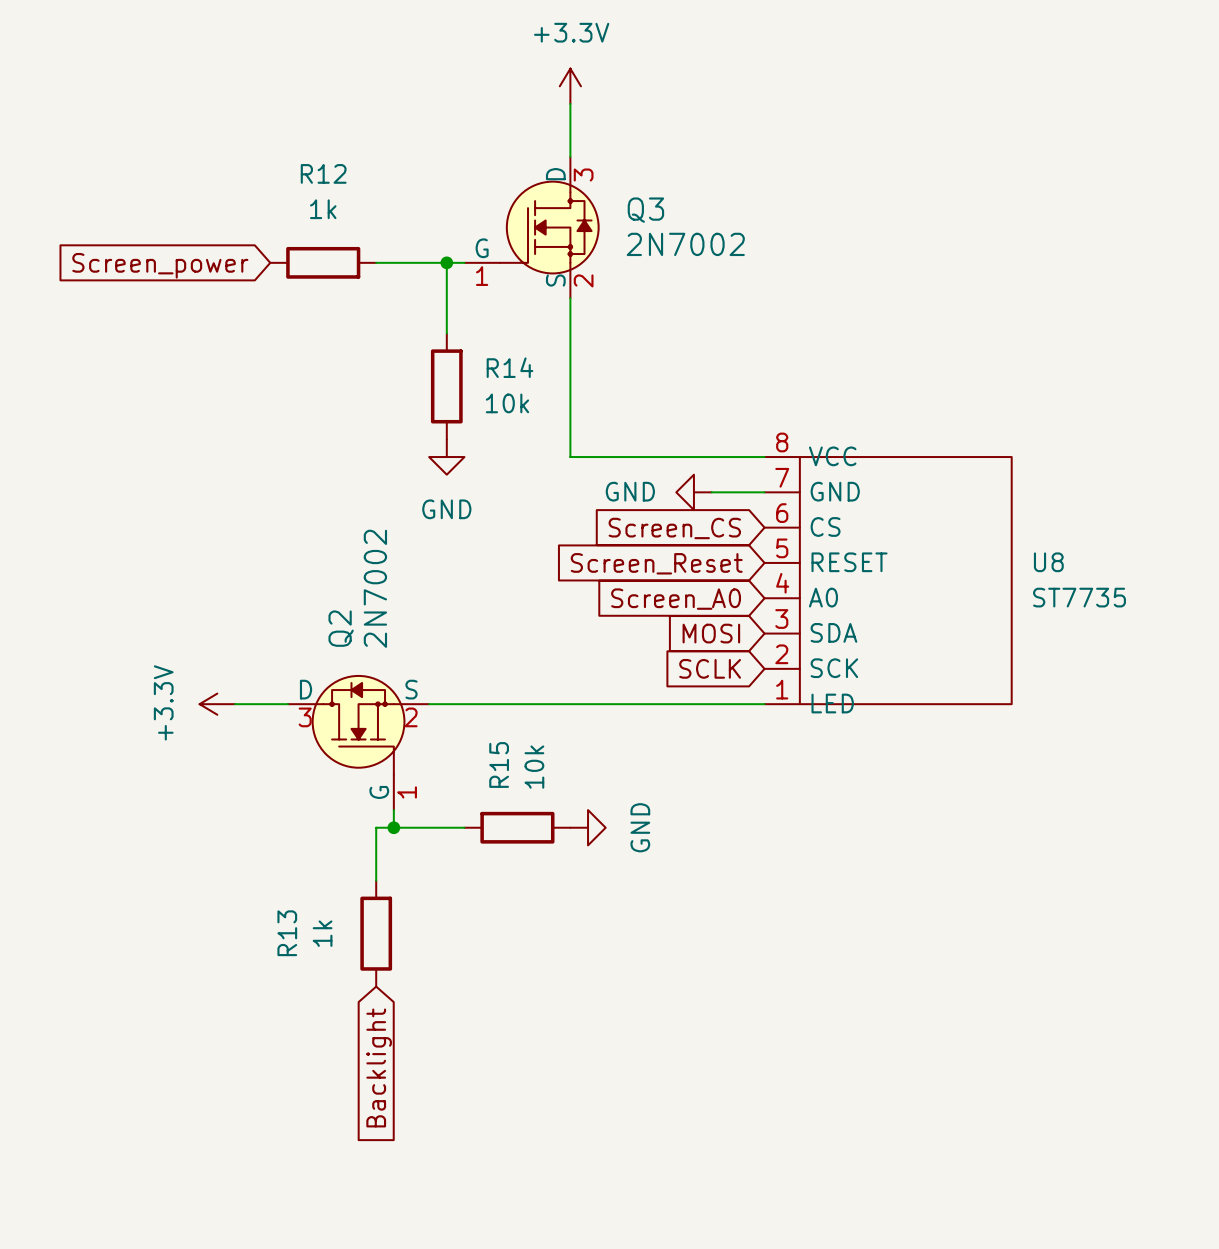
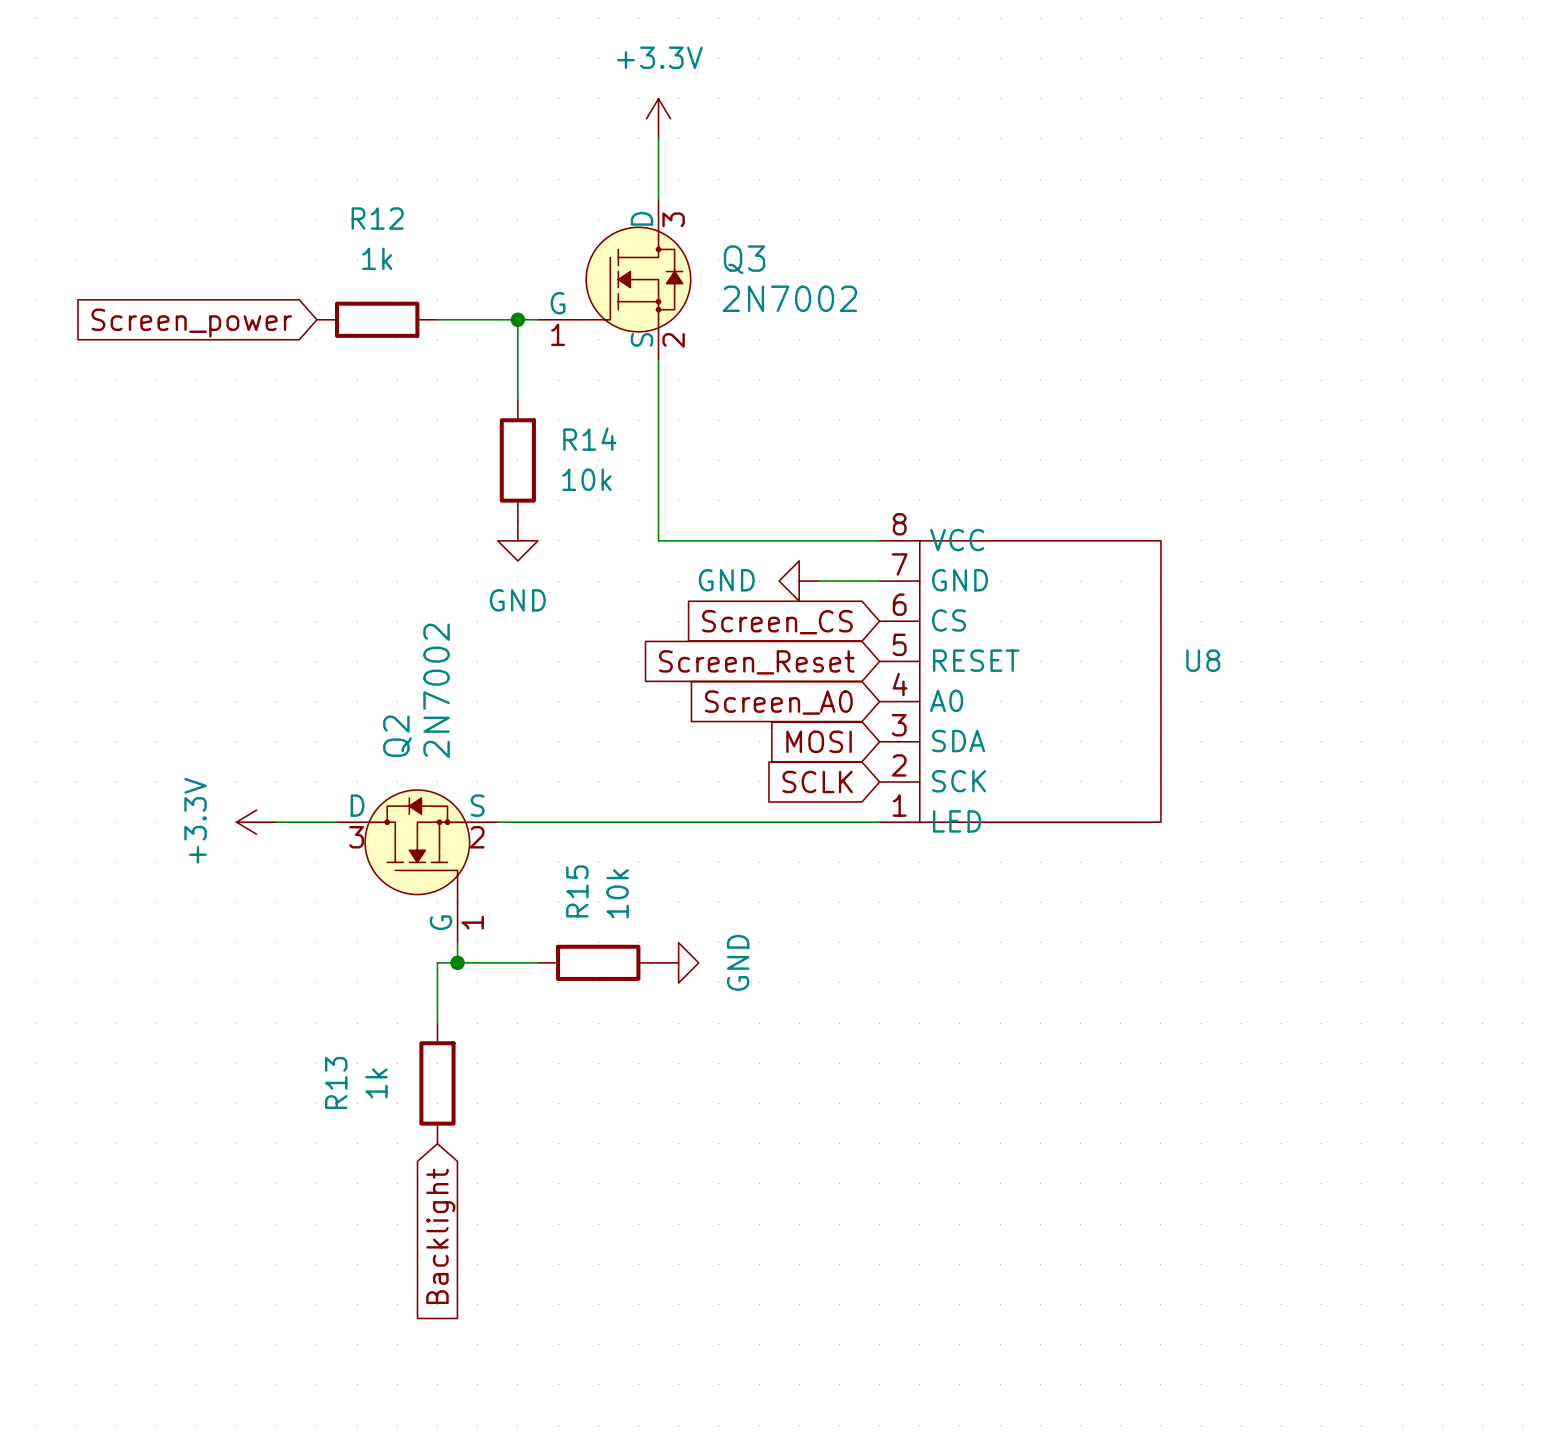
U8 value: ST7735 (1079, 597) -> none

